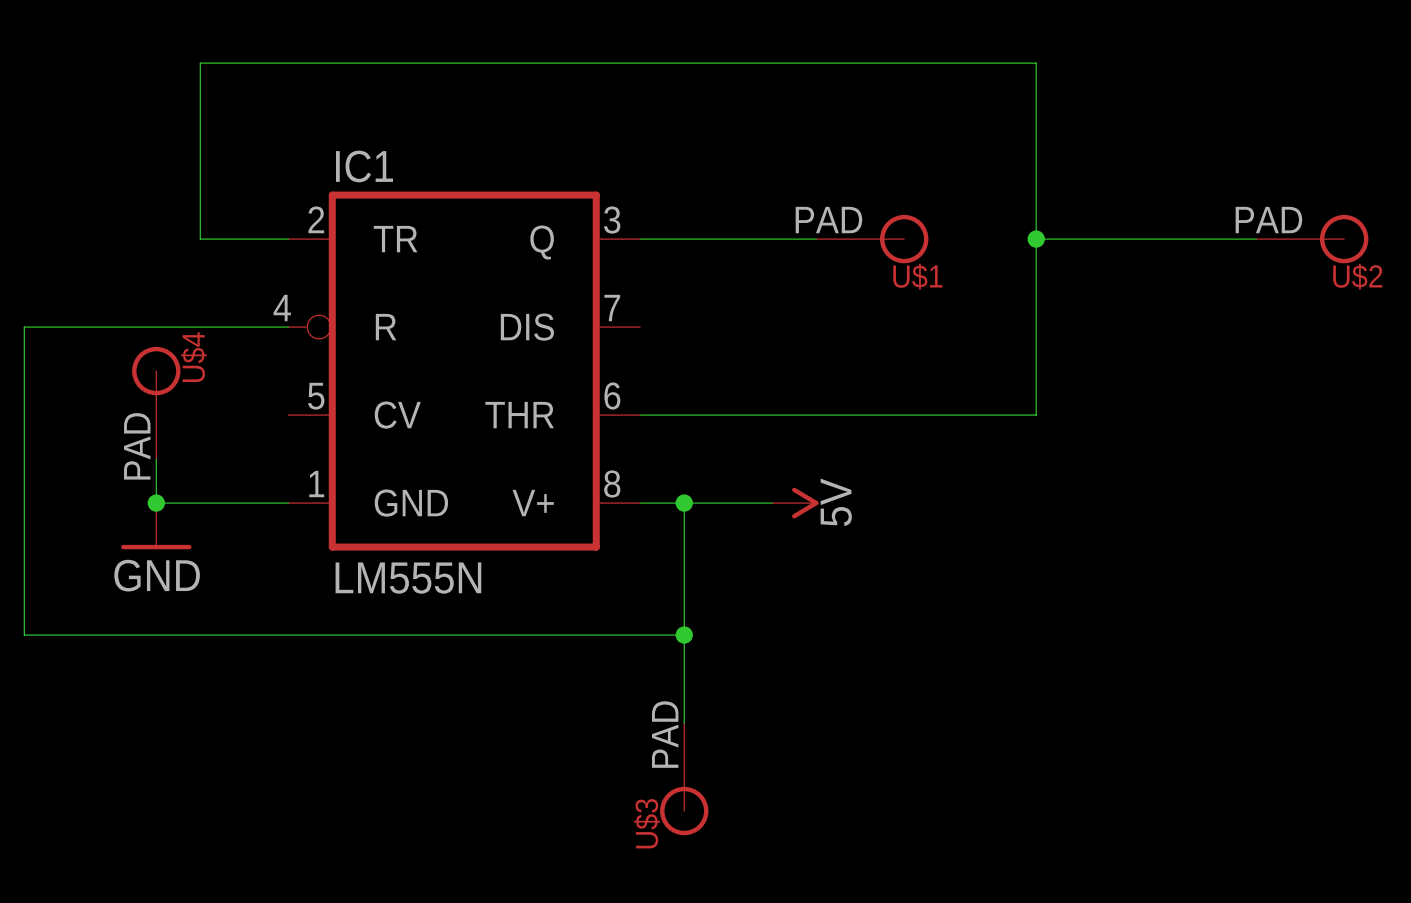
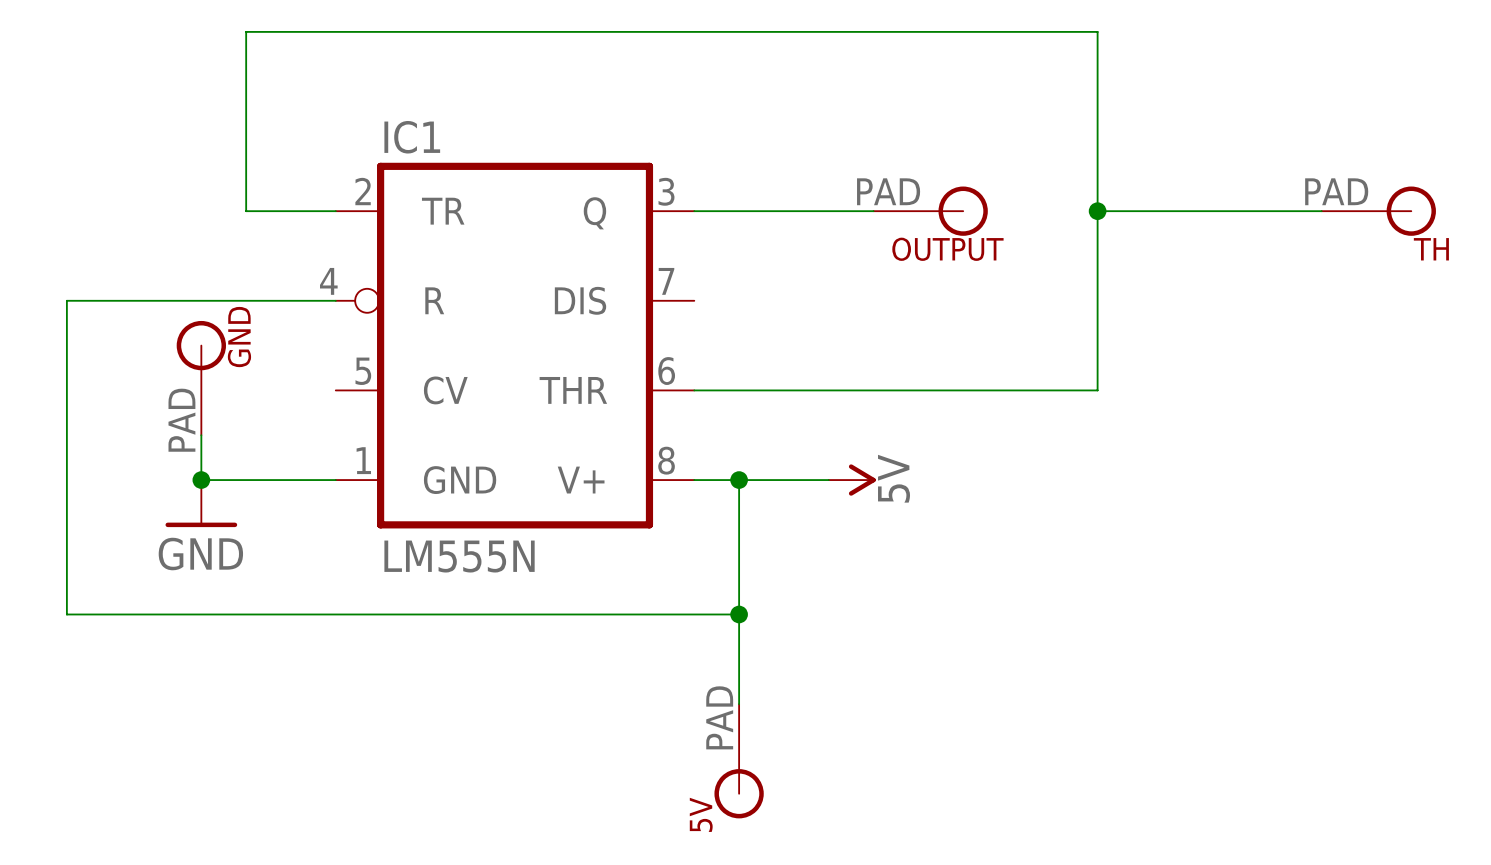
U$1 name: U$1 (917, 276) -> OUTPUT (947, 249)
U$2 name: U$2 (1357, 276) -> TH (1431, 249)
U$4 name: U$4 (193, 357) -> GND (239, 337)
U$3 name: U$3 (647, 823) -> 5V (701, 814)

